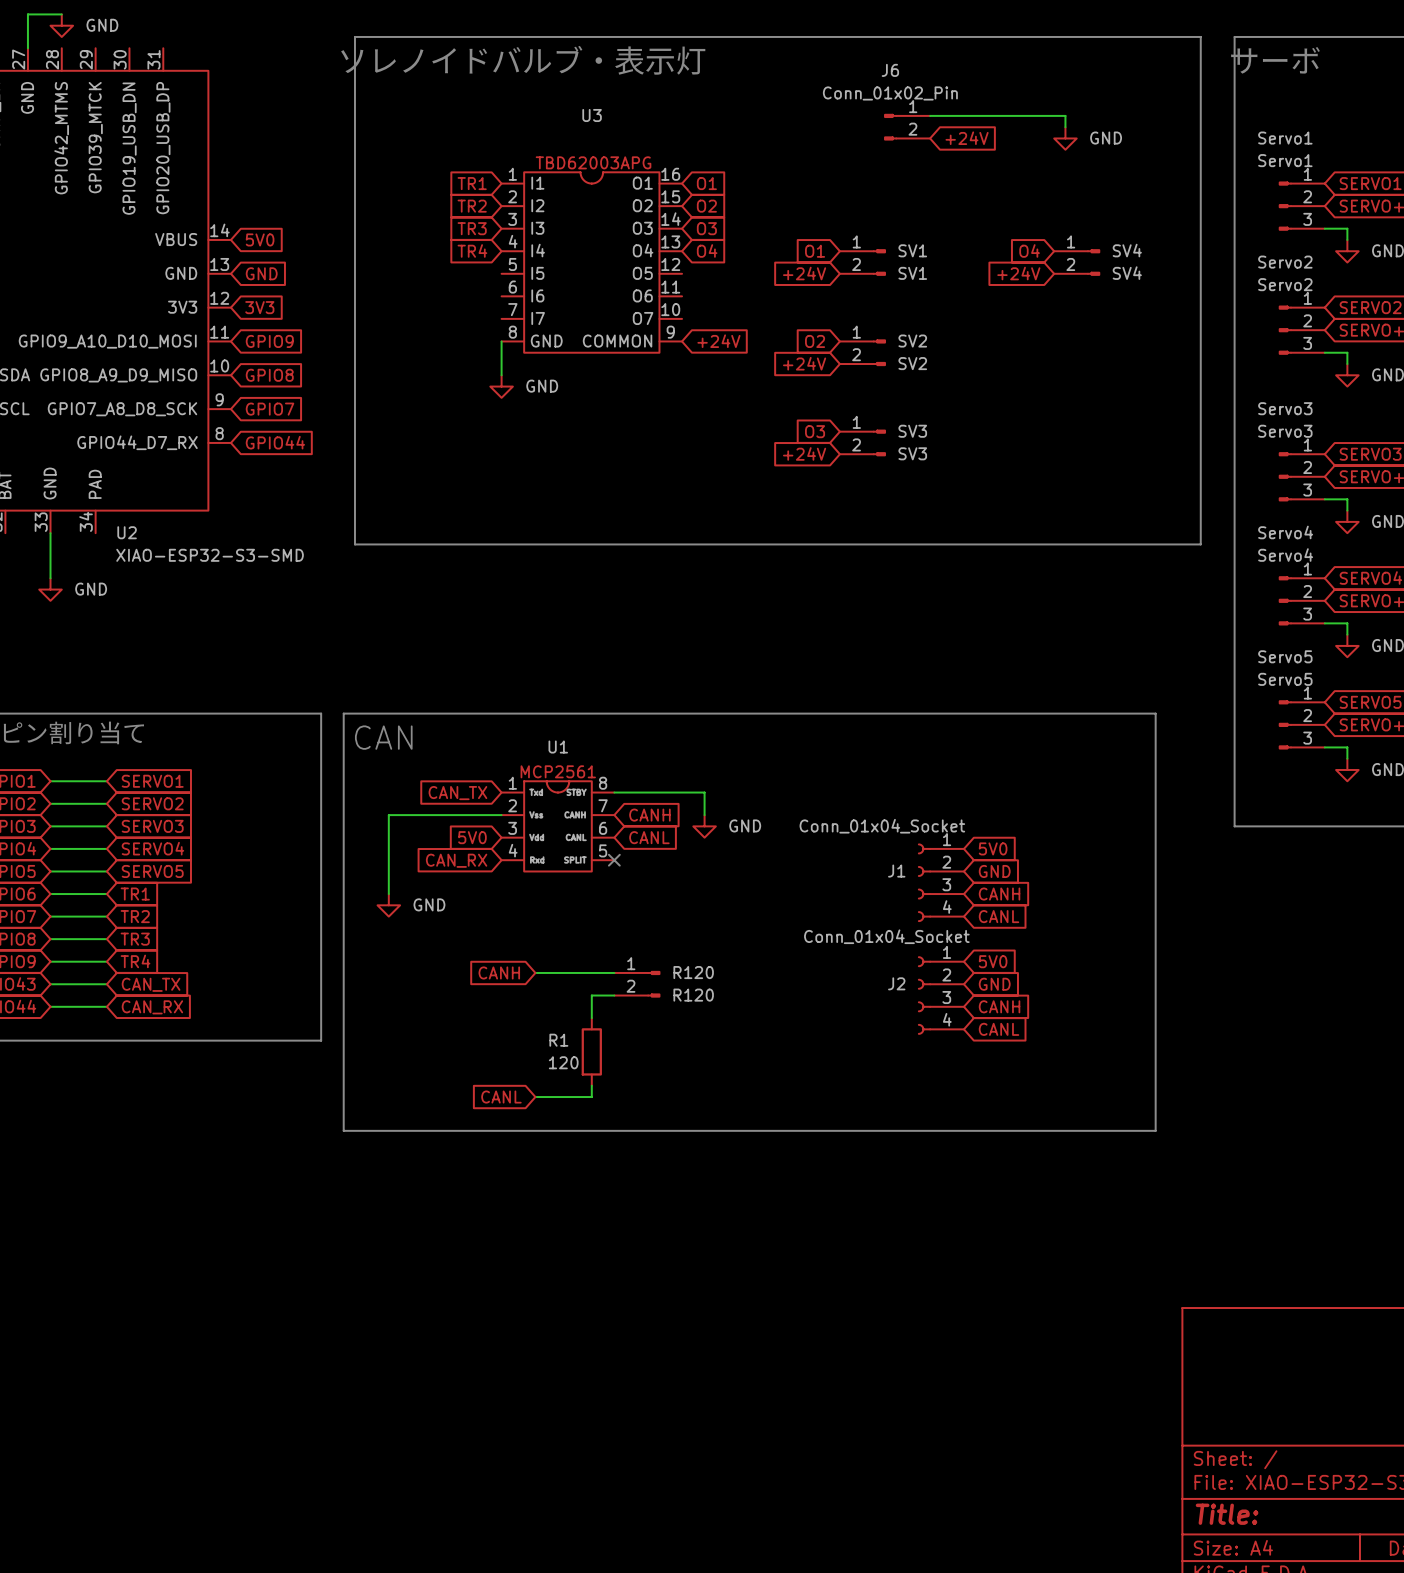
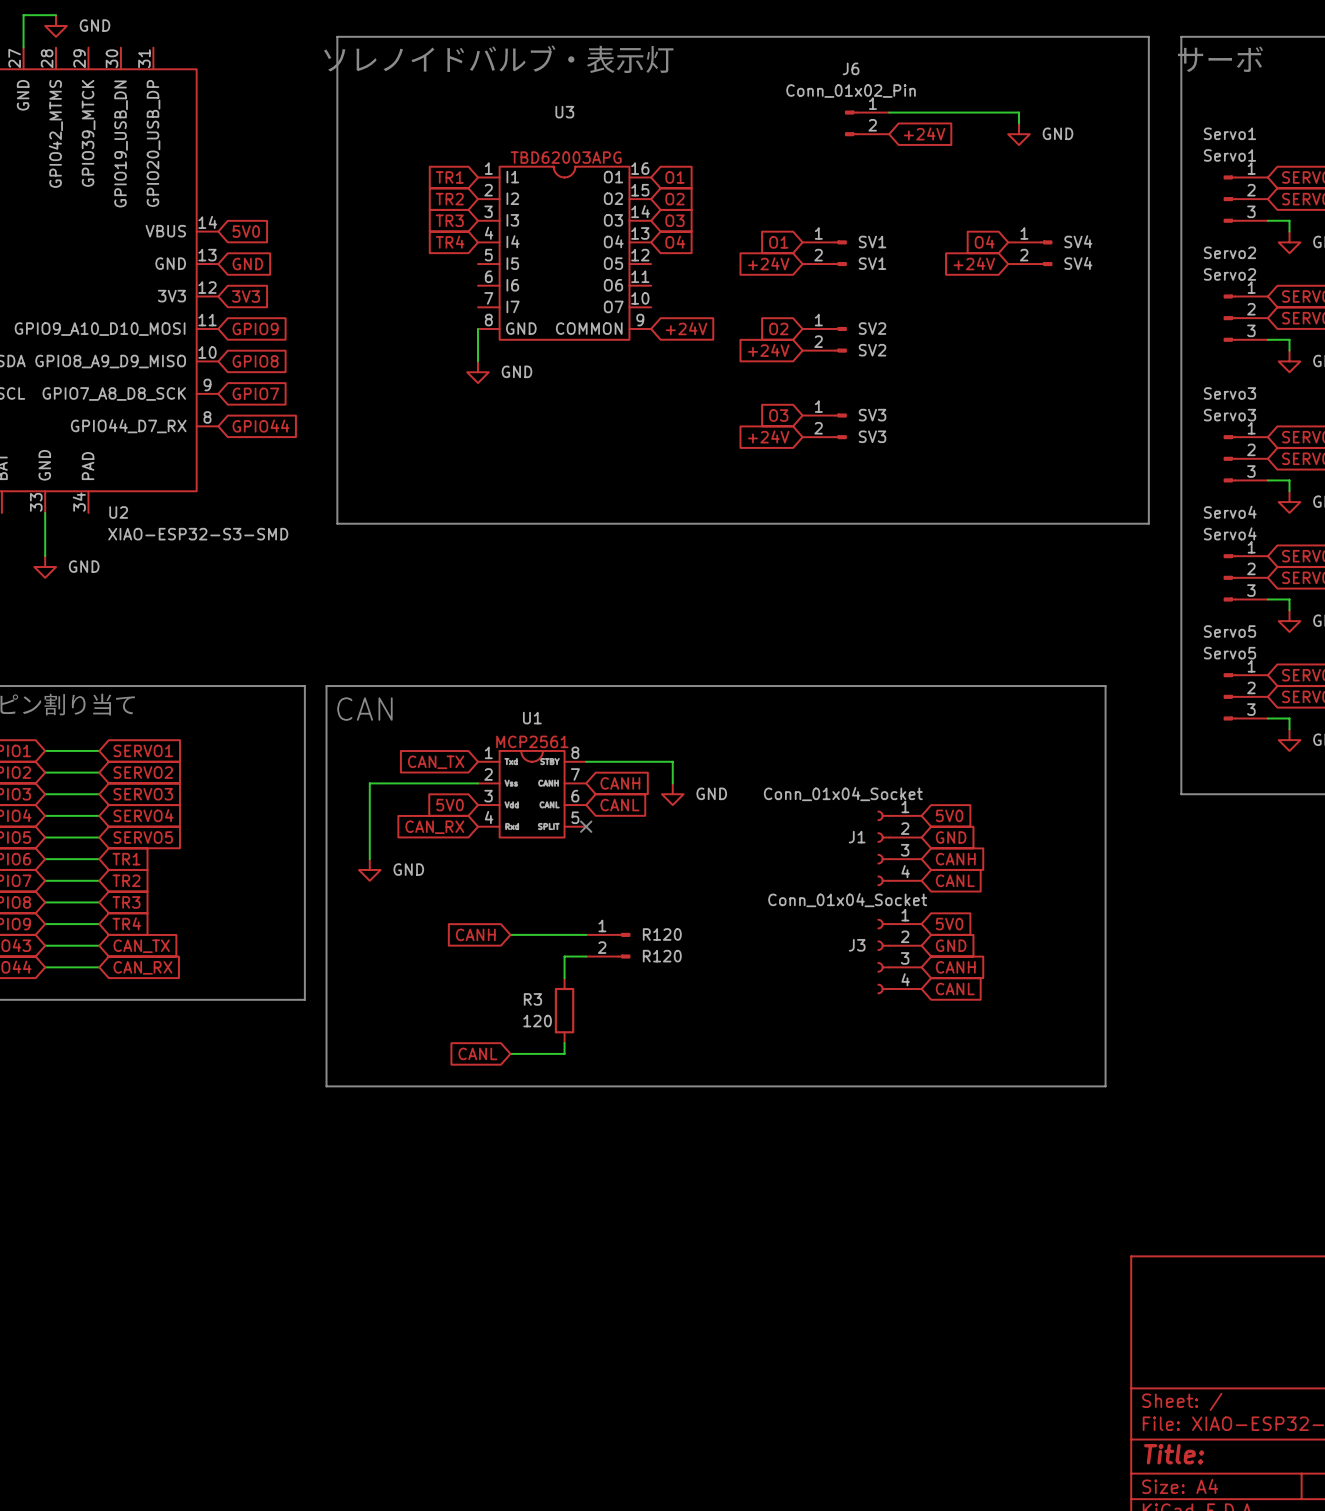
J2 name: J2 (896, 983) -> J3 (857, 945)
R1 name: R1 (558, 1040) -> R3 (532, 999)

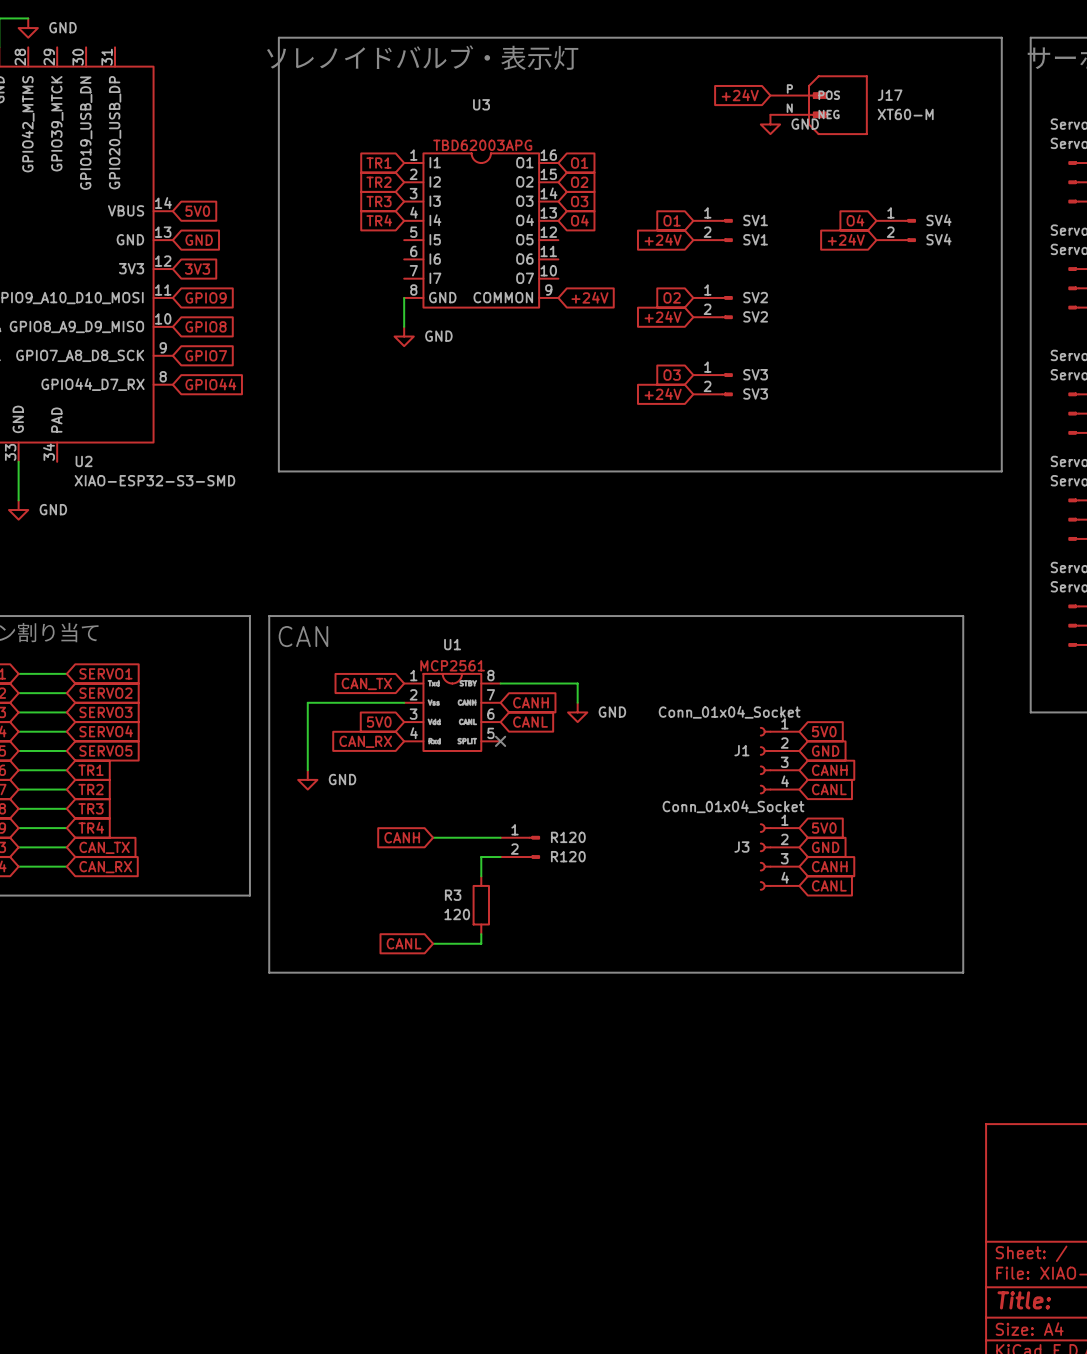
wire: (889, 112) (1019, 112) (1019, 123) -> none
J17: none -> XT60-M (819, 105)
J6: Conn_01x02_Pin (867, 123) -> none
global label rotation: 0° (924, 133) -> 180° (740, 95)
global label position: +24V (924, 133) -> +24V (740, 95)
power symbol position: GND (1019, 134) -> GND (770, 124)

